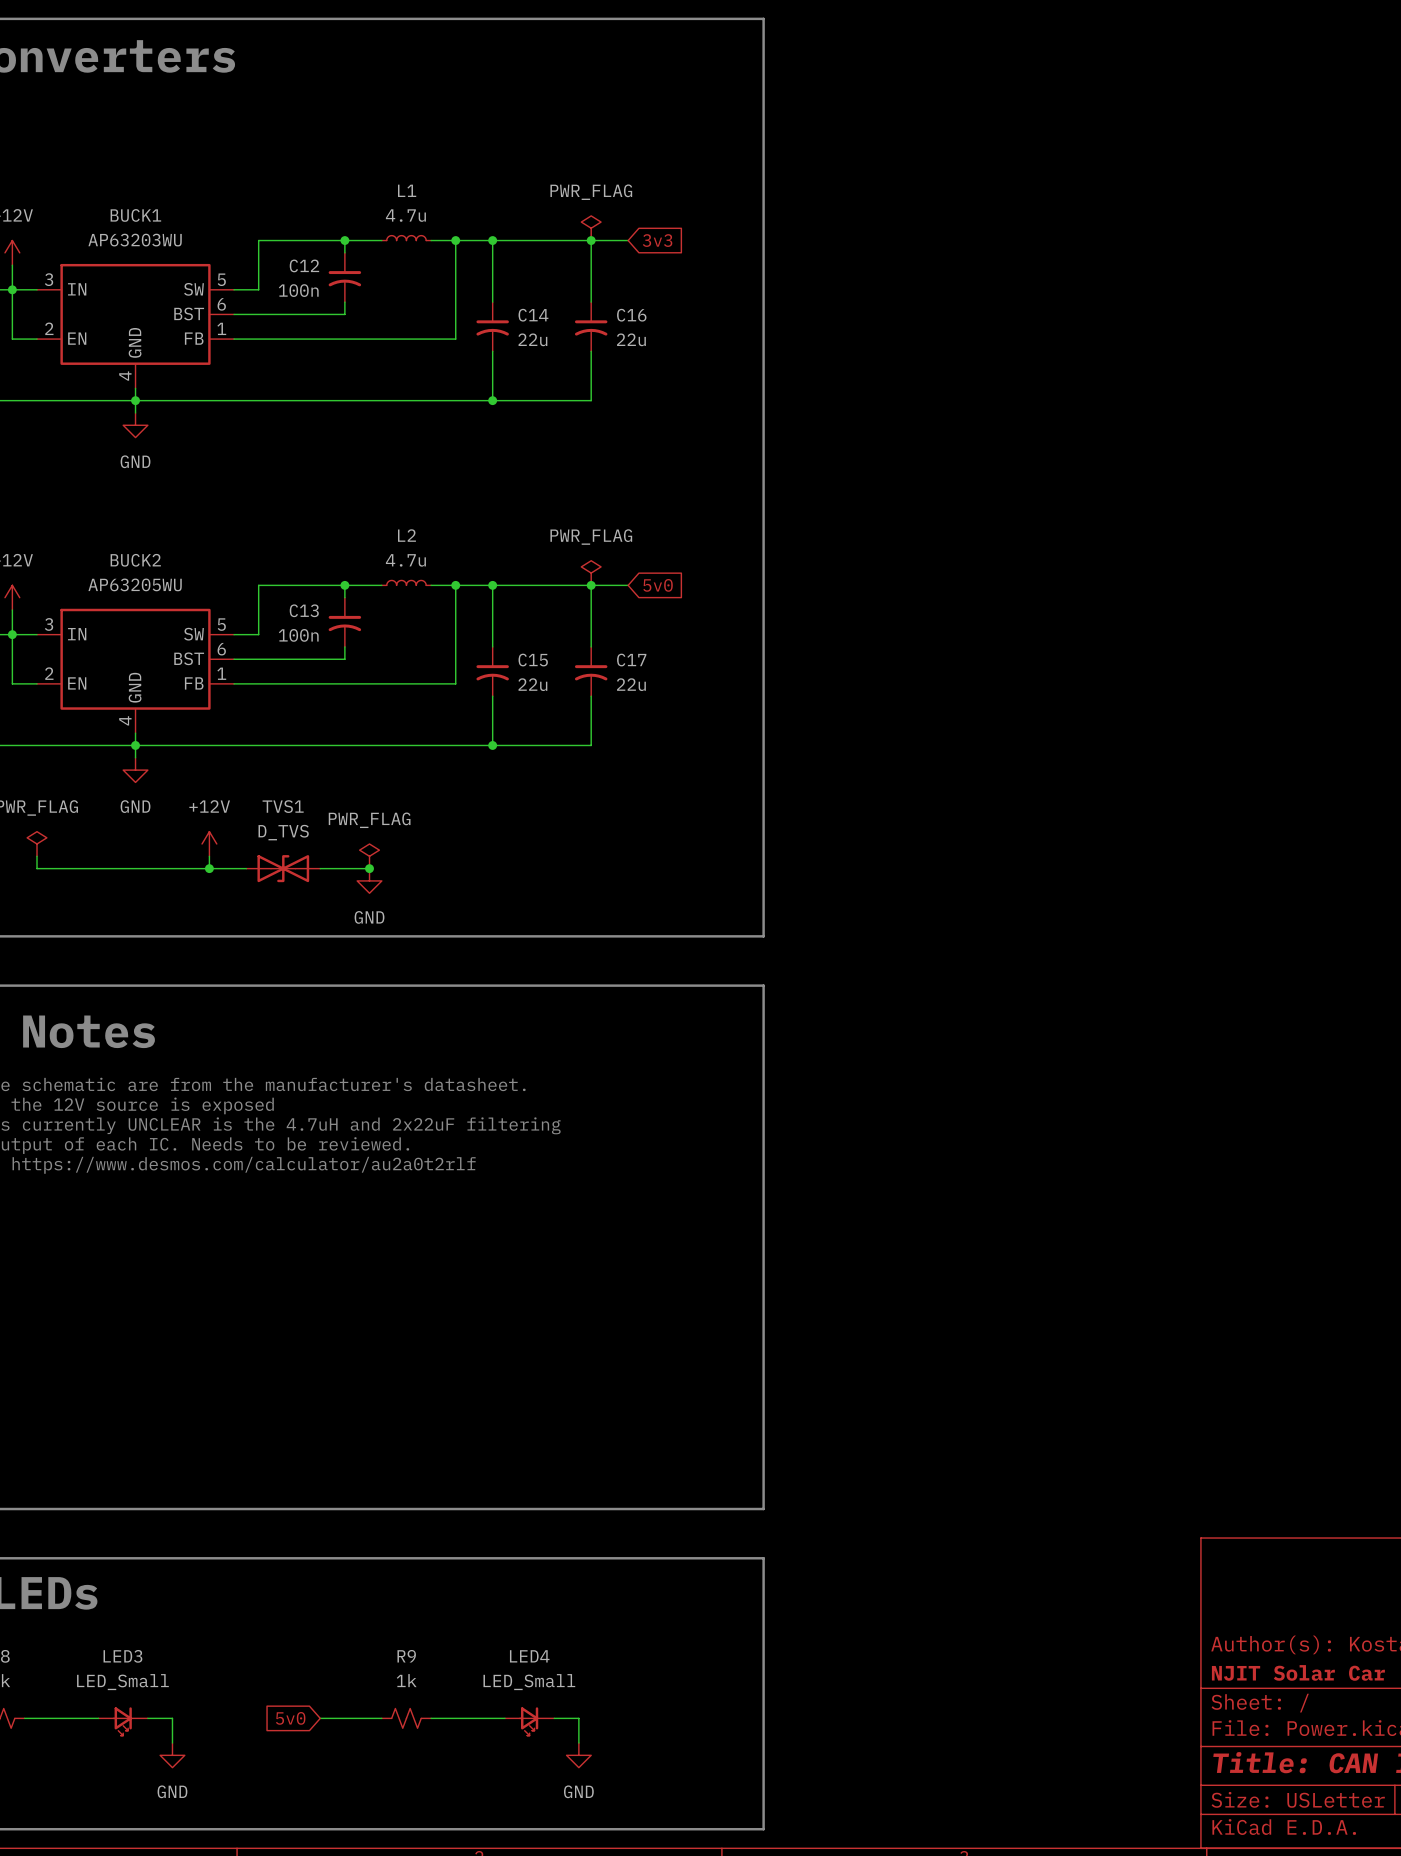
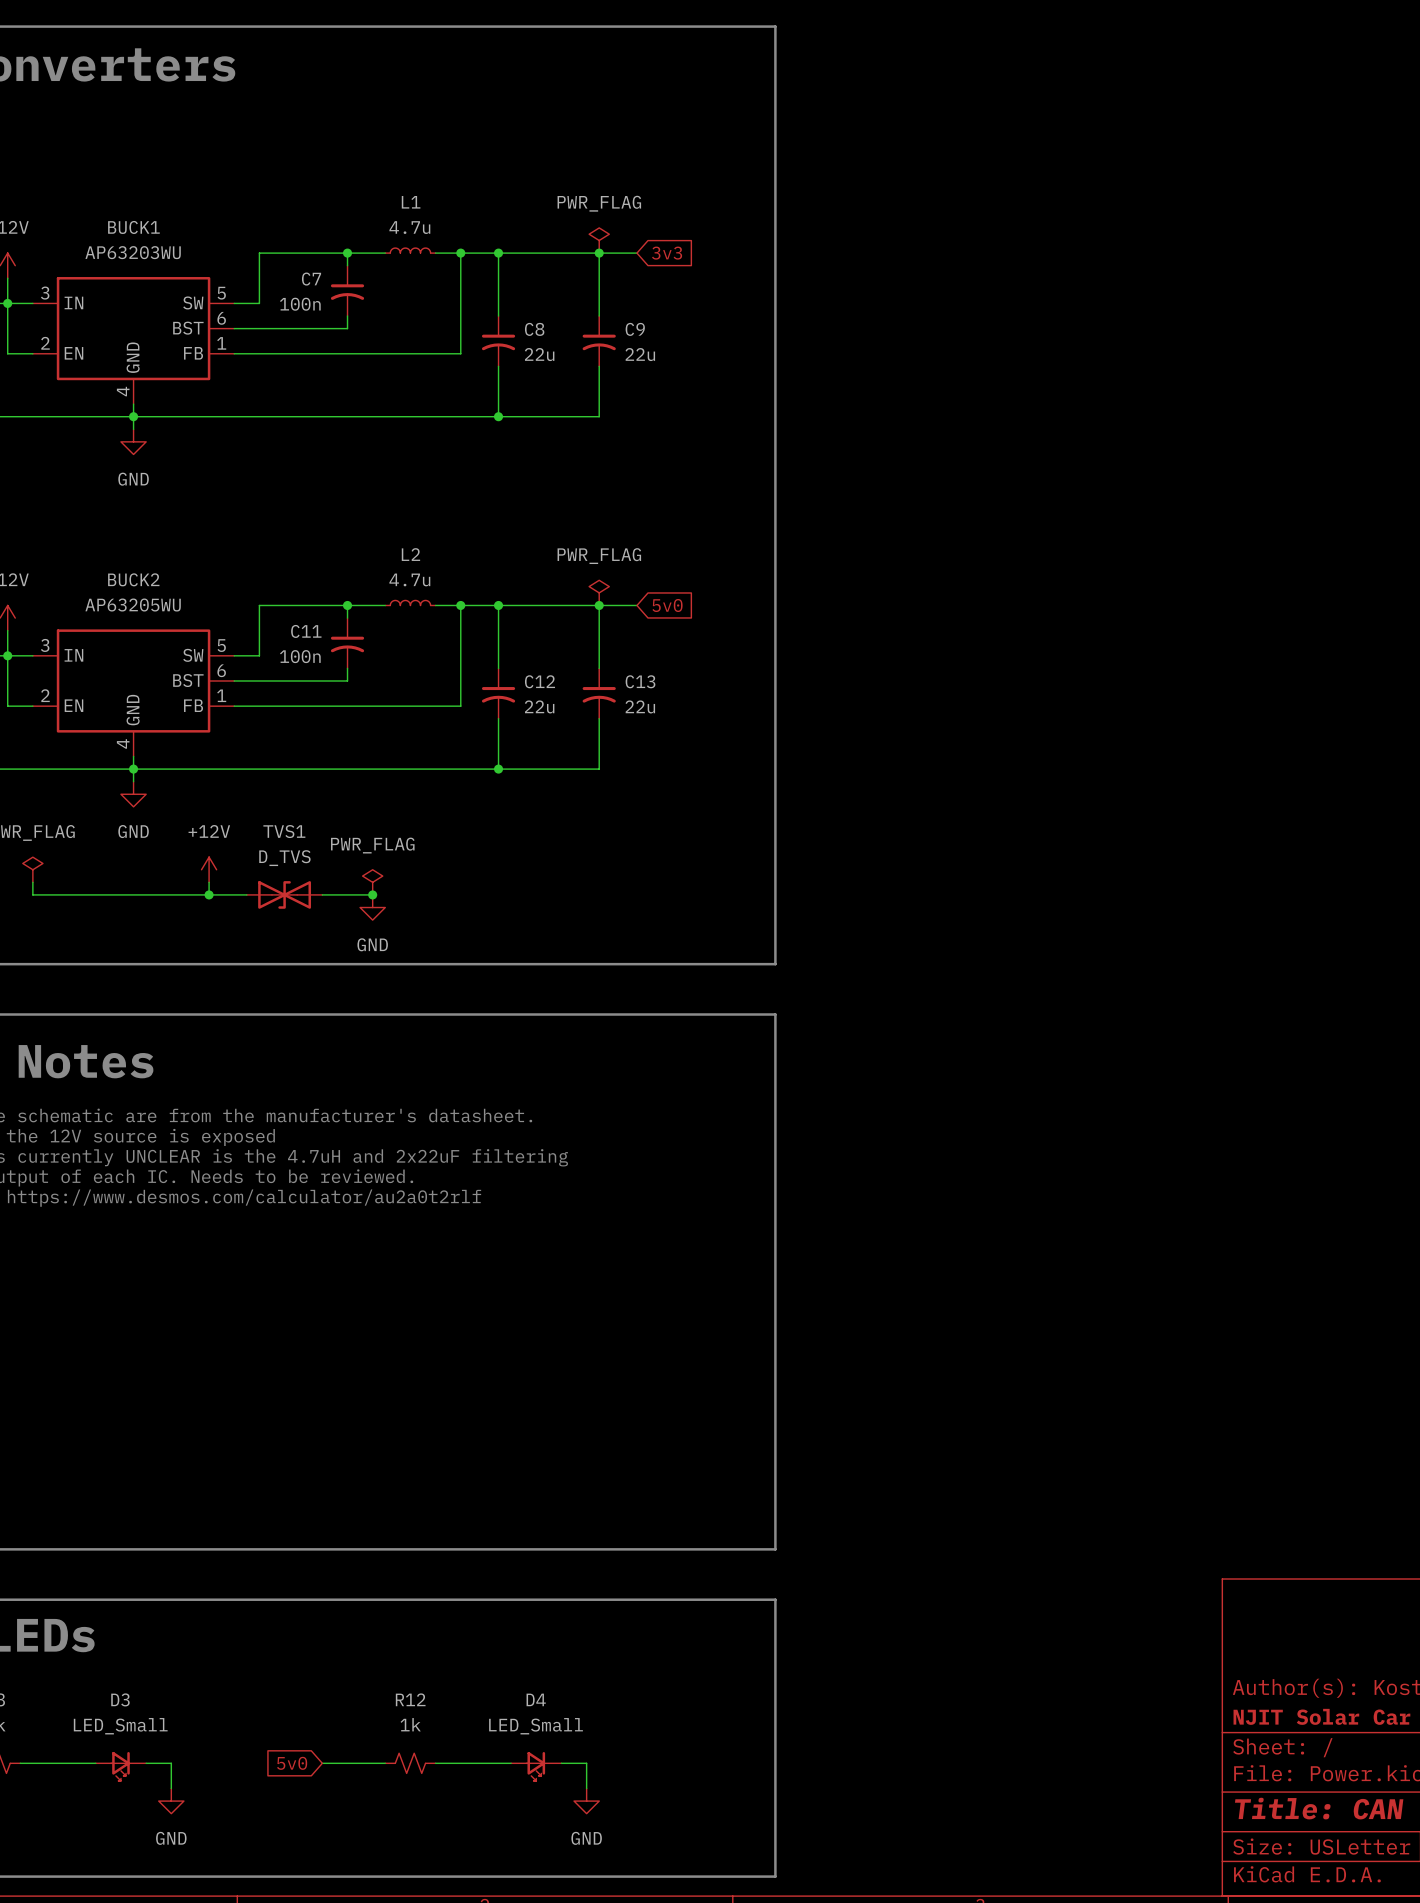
C12 name: C12 (304, 265) -> C7 (311, 279)
C14 name: C14 (533, 315) -> C8 (534, 329)
C16 name: C16 (631, 315) -> C9 (635, 329)
C13 name: C13 (304, 610) -> C11 (306, 631)
C15 name: C15 (533, 660) -> C12 (539, 681)
C17 name: C17 (631, 660) -> C13 (640, 681)
LED3 name: LED3 (122, 1656) -> D3 (120, 1699)
R9 name: R9 (406, 1656) -> R12 (410, 1699)
LED4 name: LED4 (529, 1656) -> D4 (536, 1699)

